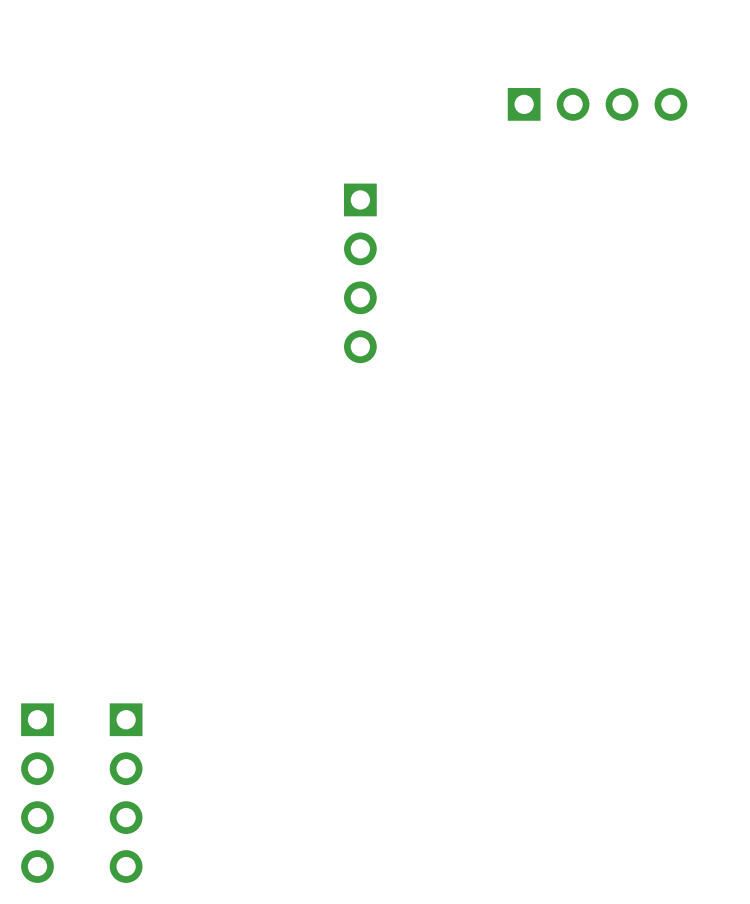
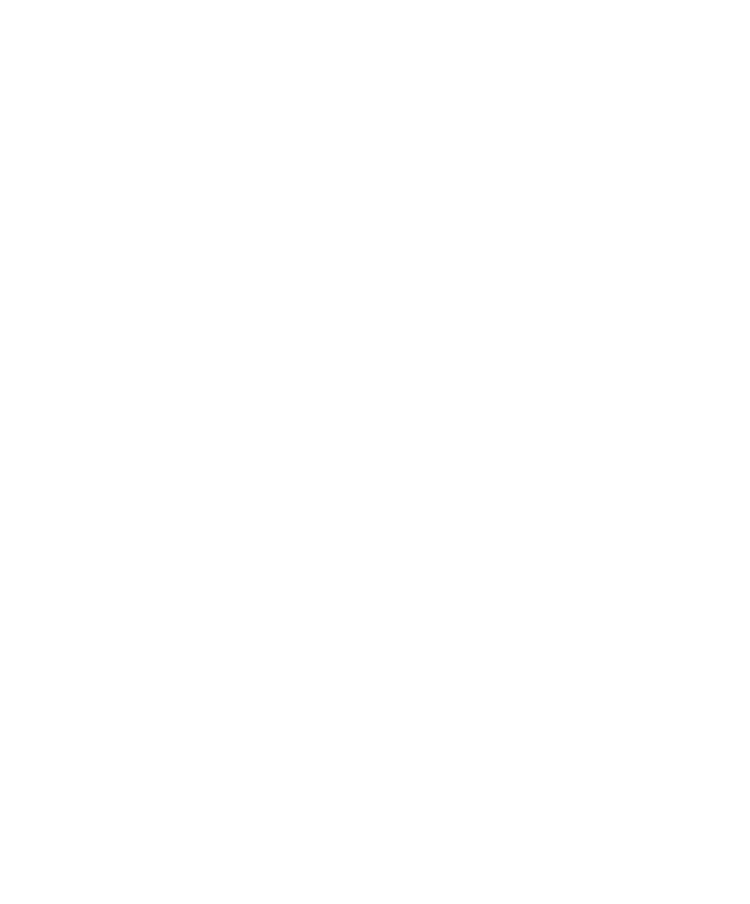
part: (597, 104) -> none
part: (360, 273) -> none
part: (37, 793) -> none
part: (126, 793) -> none

